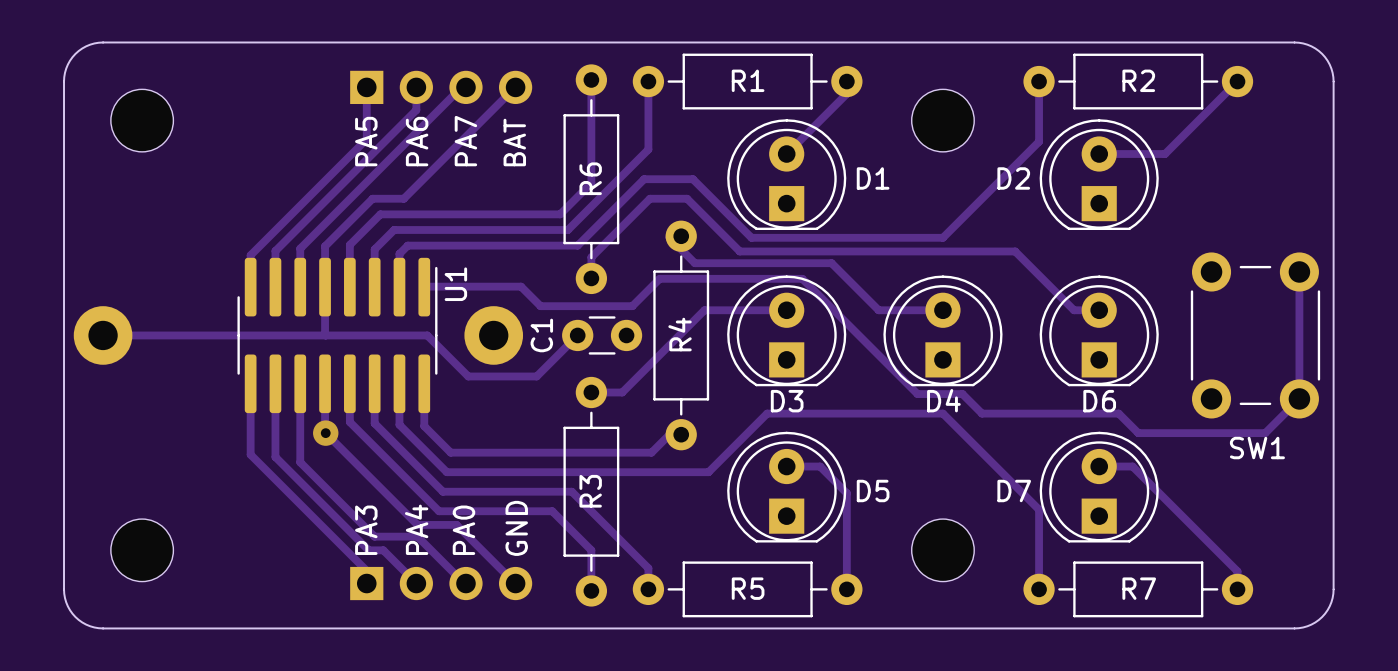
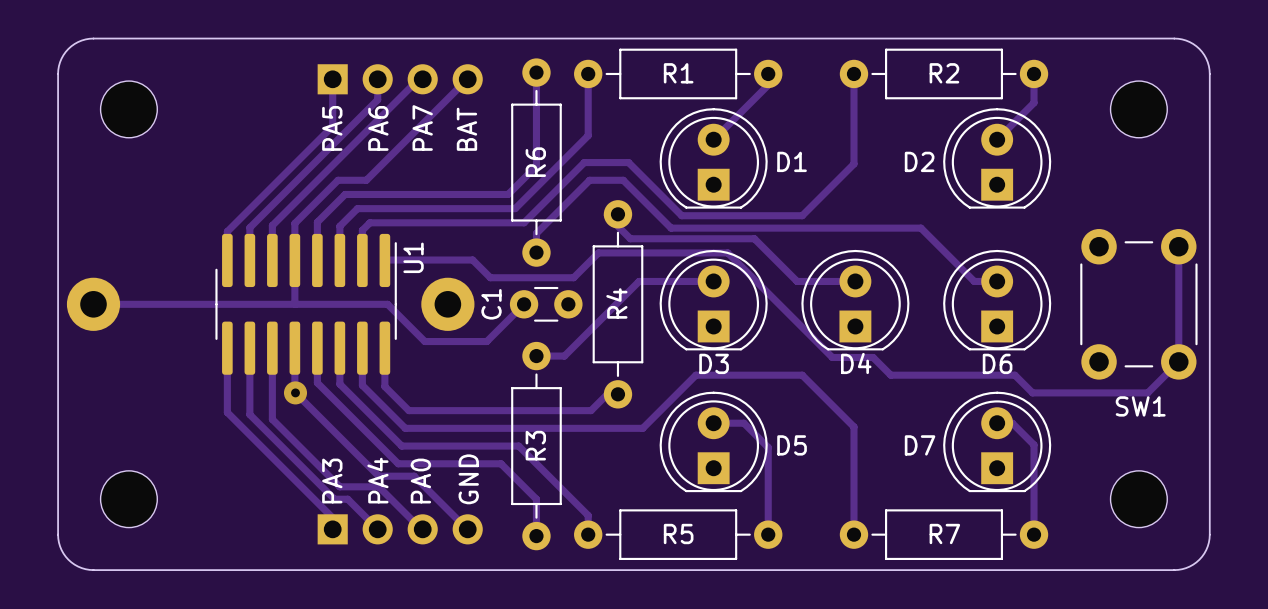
track: (1039, 81) (1039, 141) (942, 237) (884, 237) -> (853, 73) (853, 163) (802, 215)
R2 position: (1138, 81) -> (944, 73)
track: (1237, 81) (1165, 154) (1099, 154) -> (1034, 73) (1034, 102) (997, 139)
part: (942, 120) -> none
part: none -> (1138, 109)
track: (884, 413) (942, 413) (1039, 509) (1039, 589) -> (802, 375) (853, 426) (853, 534)
track: (1115, 466) (1132, 466) (1237, 571) (1237, 589) -> (1012, 423) (1034, 444) (1034, 534)
part: (942, 550) -> none
part: none -> (1138, 499)
R7 position: (1138, 589) -> (944, 534)

